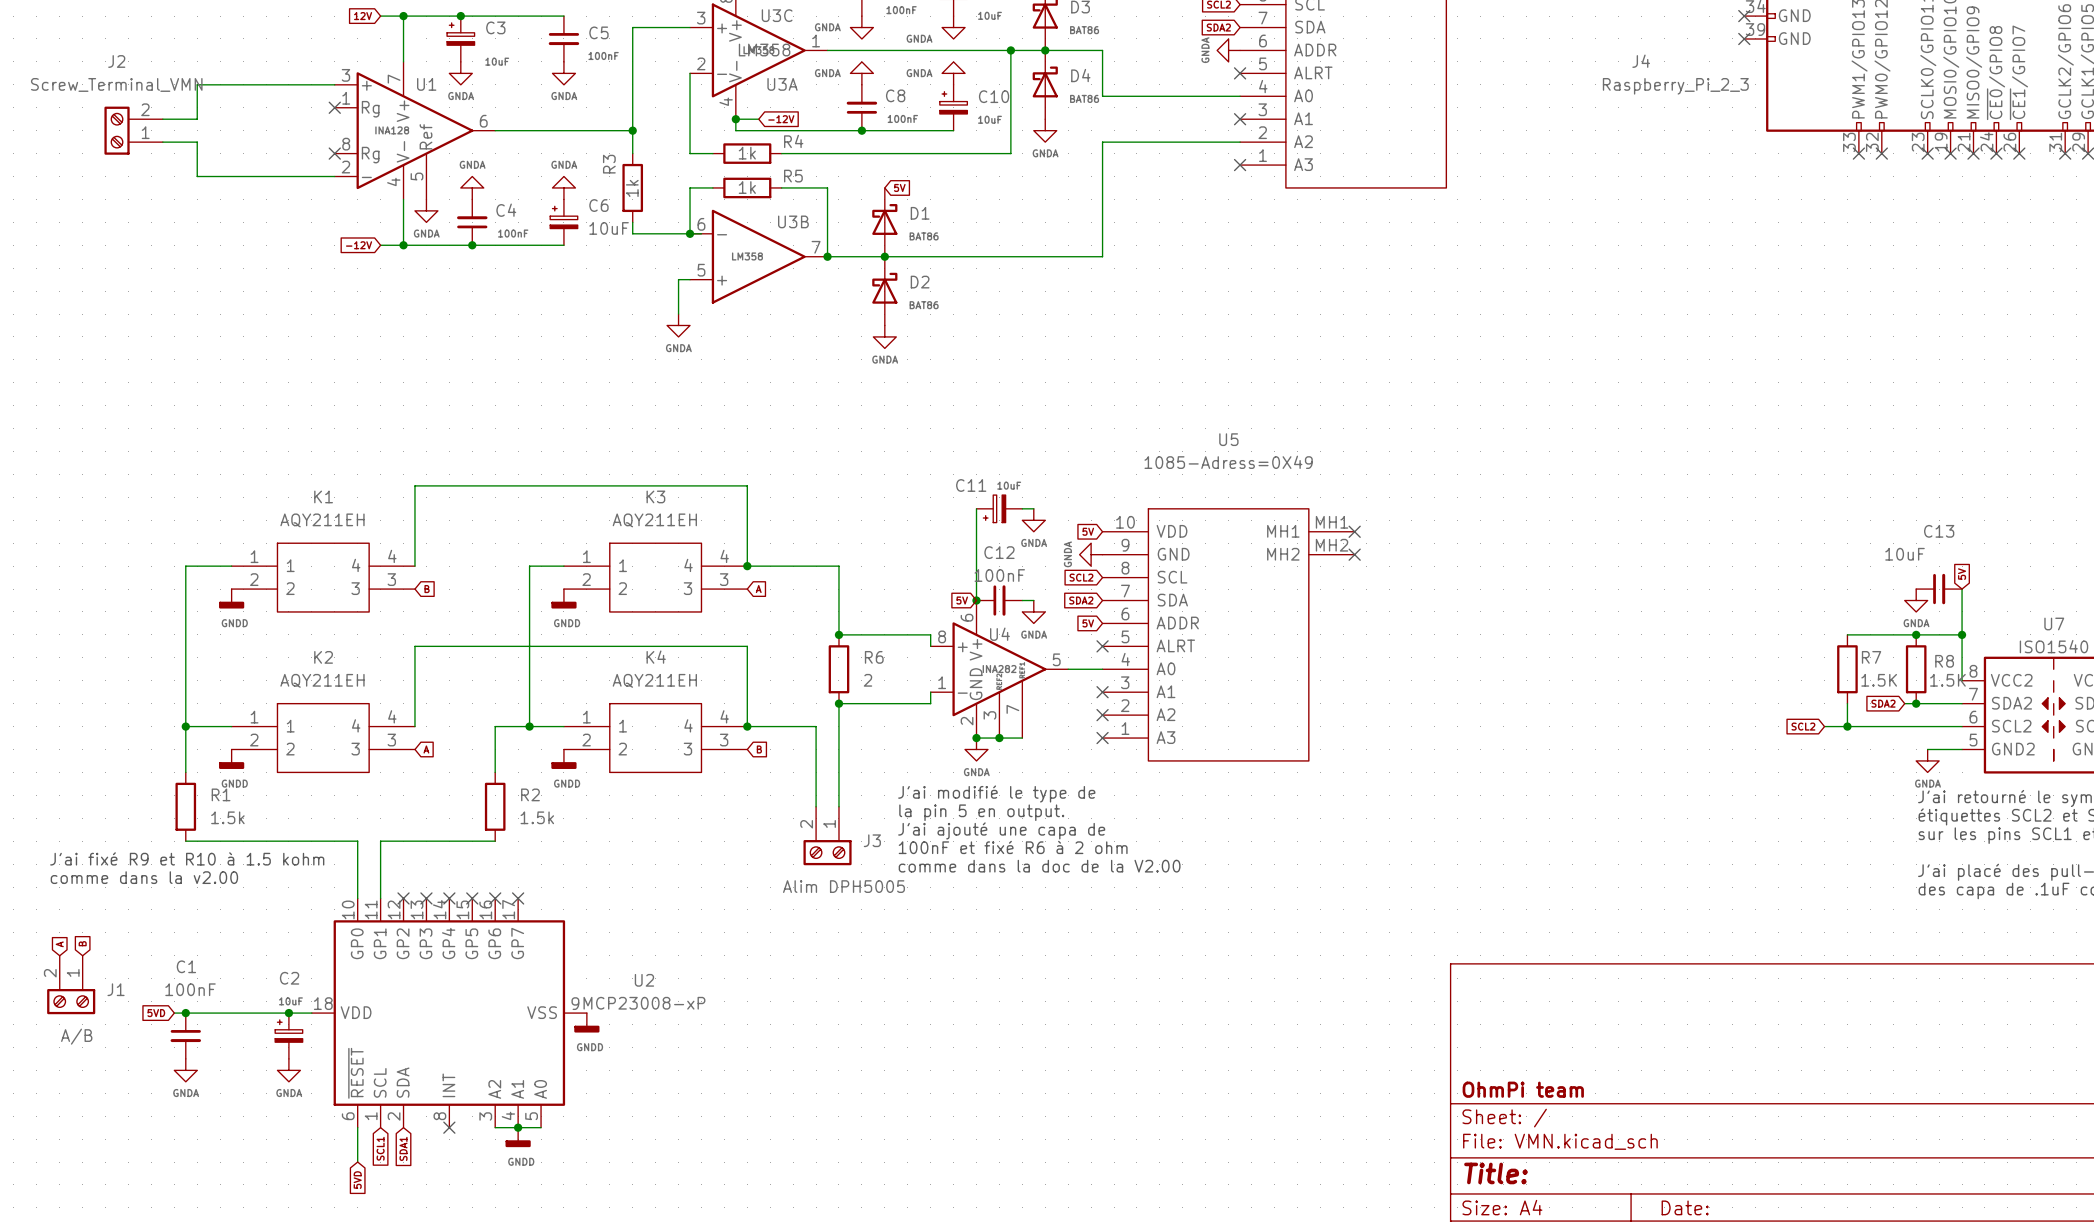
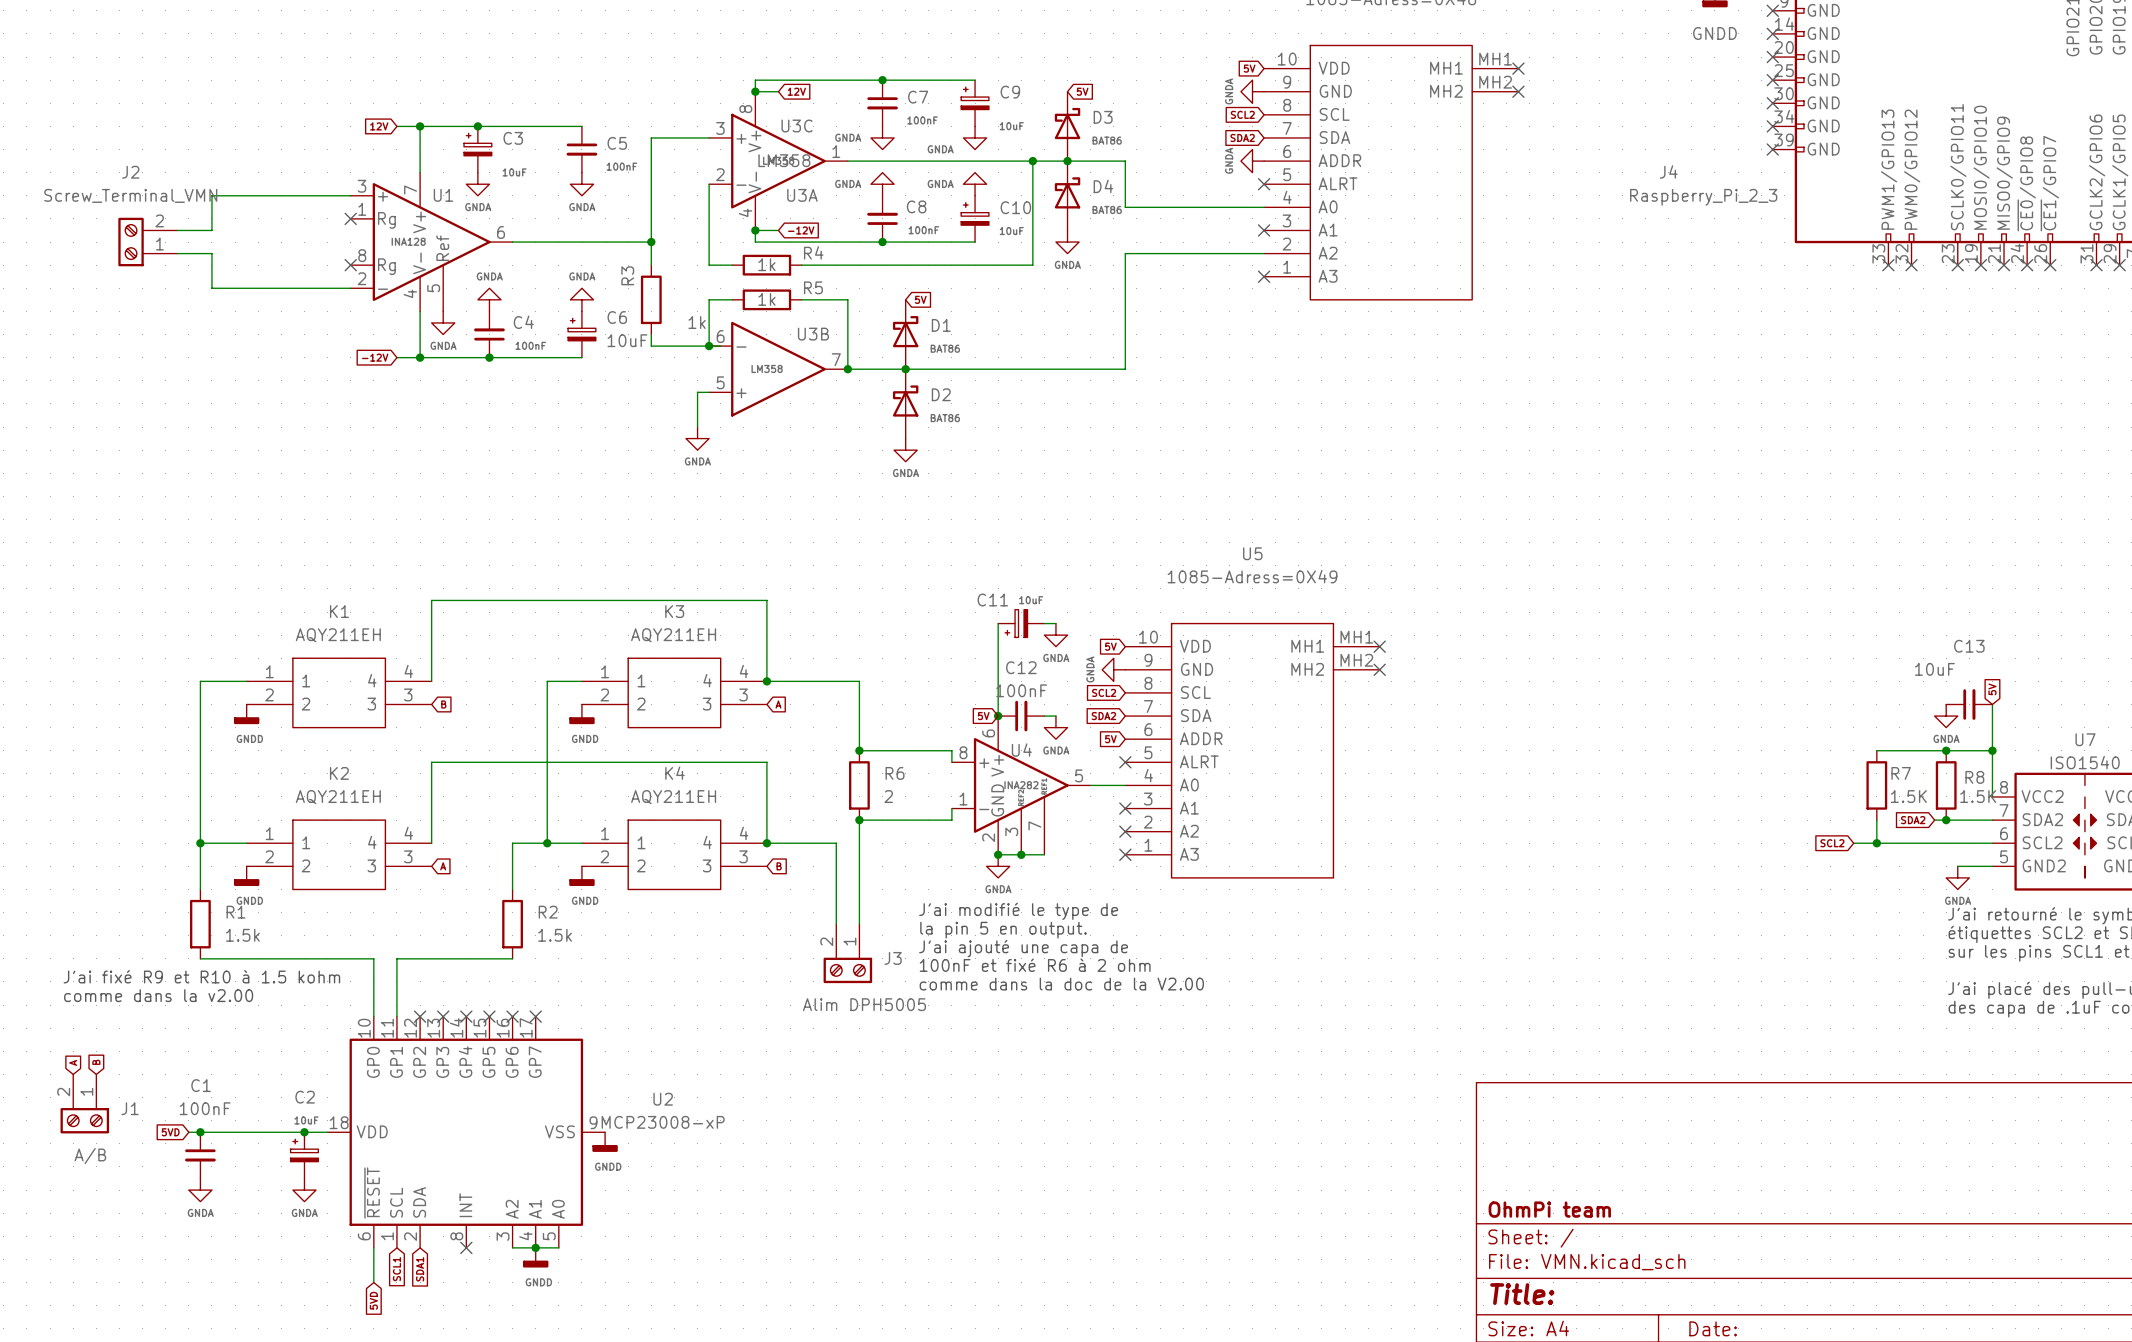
R3 value rotation: 0° (632, 188) -> 90° clockwise (697, 322)
R3 value position: 1k (632, 188) -> 1k (697, 322)

